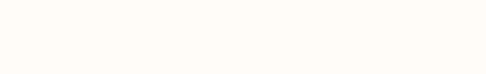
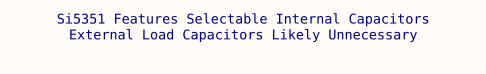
text: none -> Si5351 Features Selectable Internal Capacitors (242, 19)
text: none -> External Load Capacitors Likely Unnecessary (243, 35)

